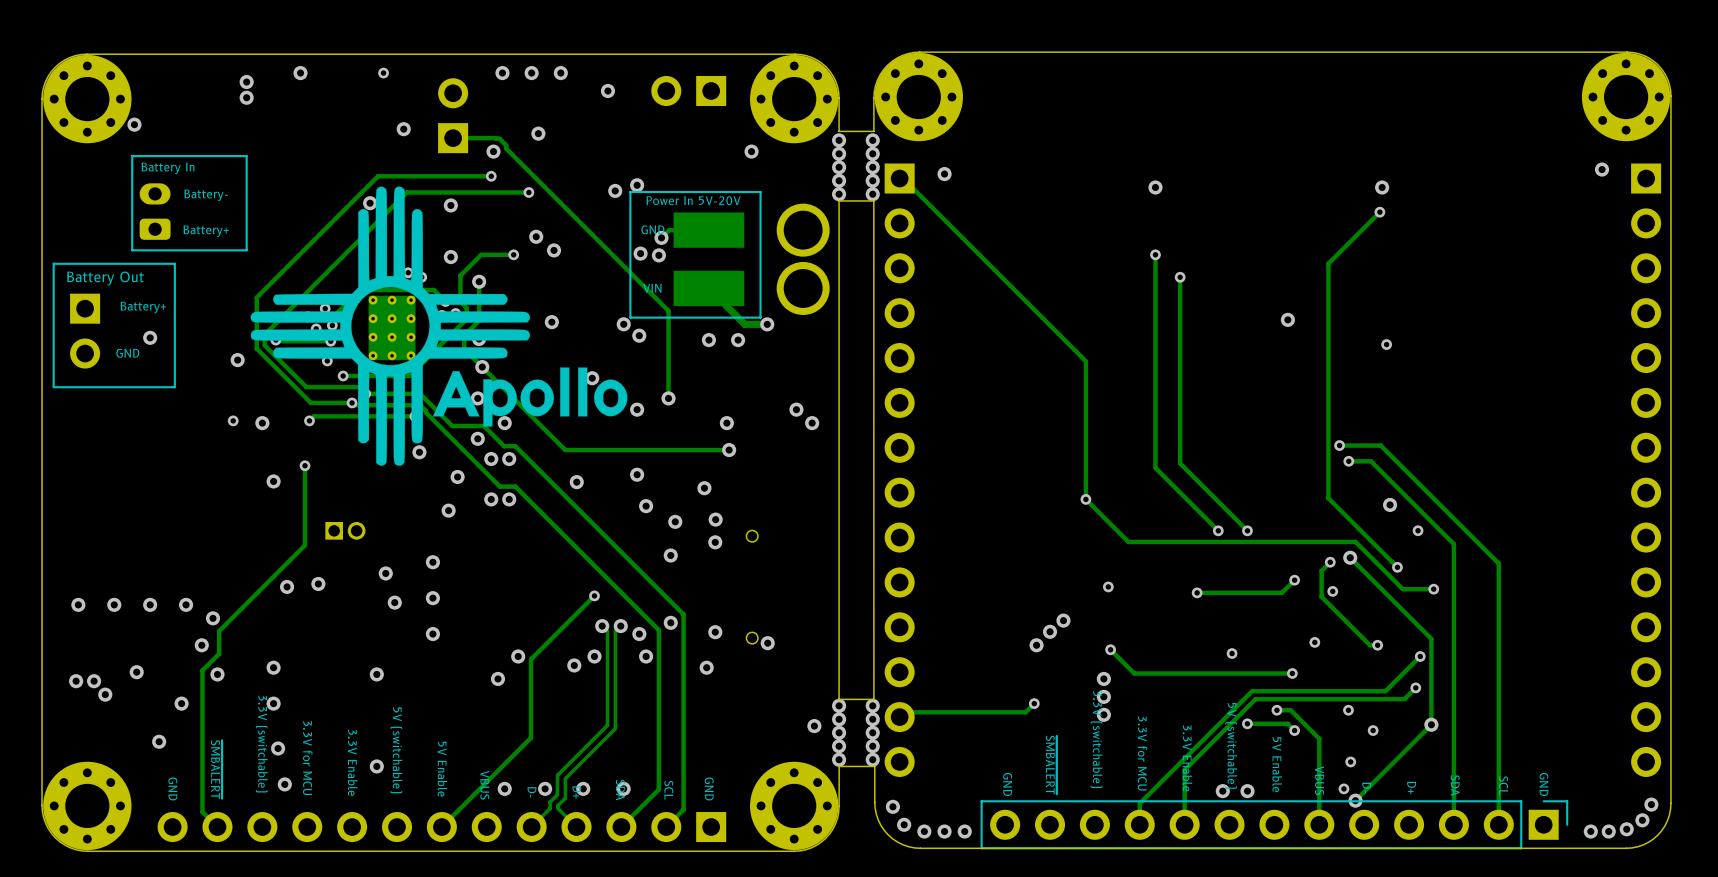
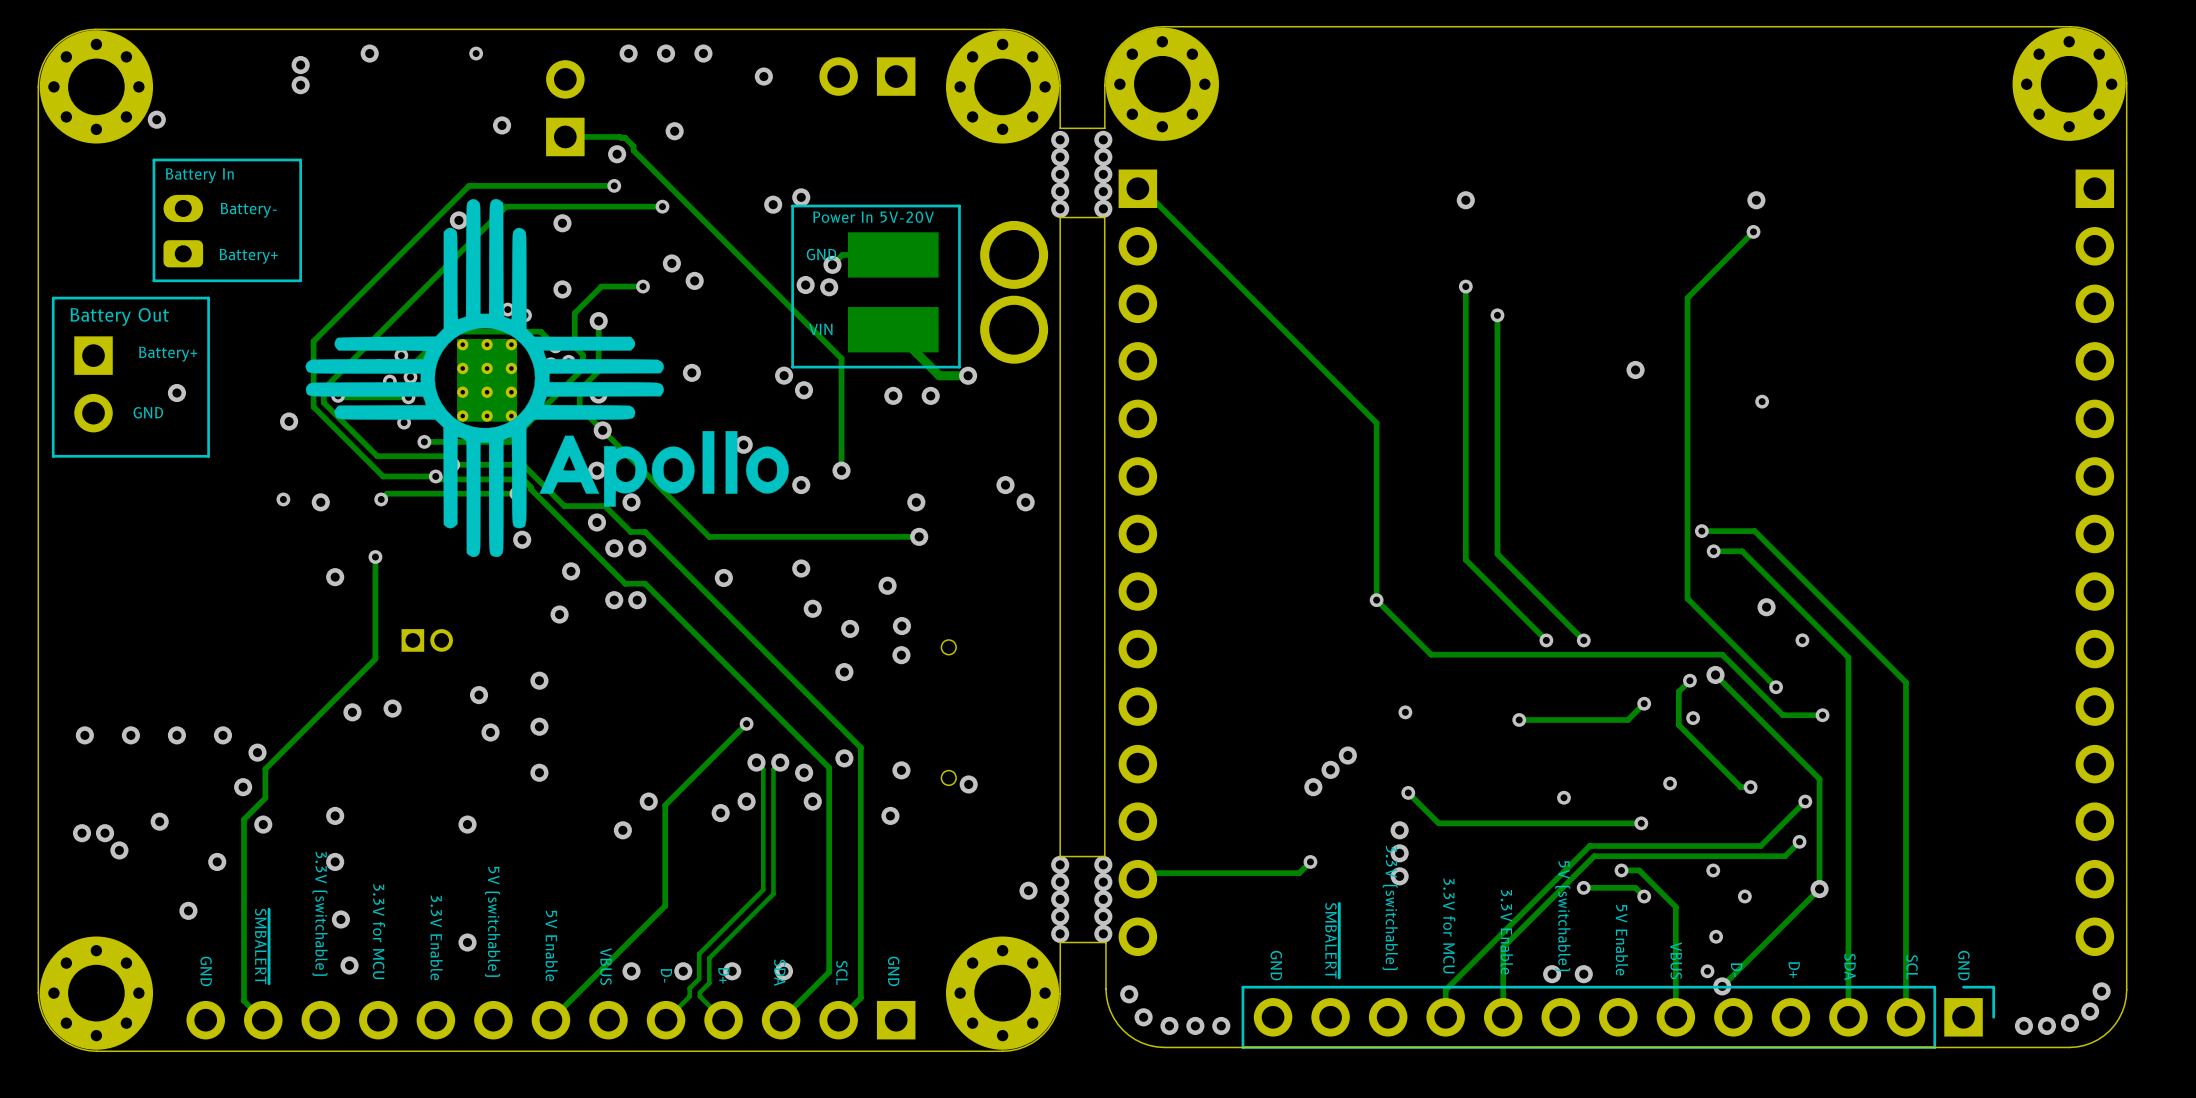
via: (751, 151) -> none
via: (1602, 169) -> none
via: (944, 174) -> none

